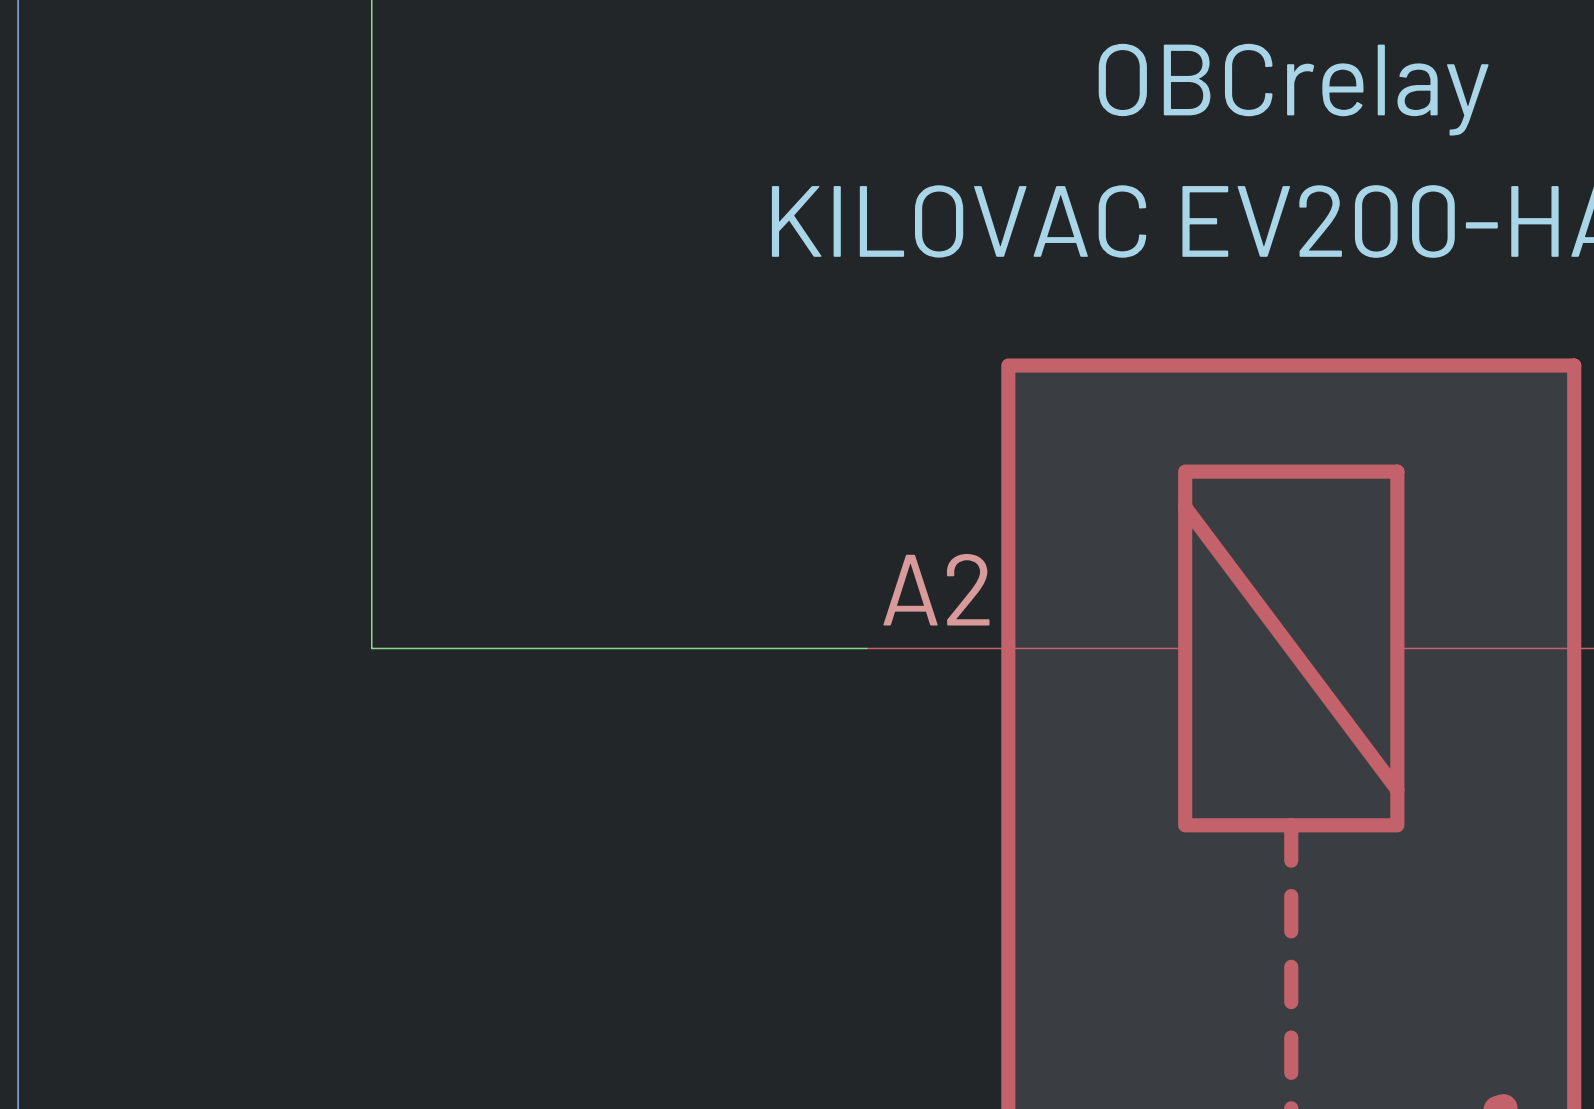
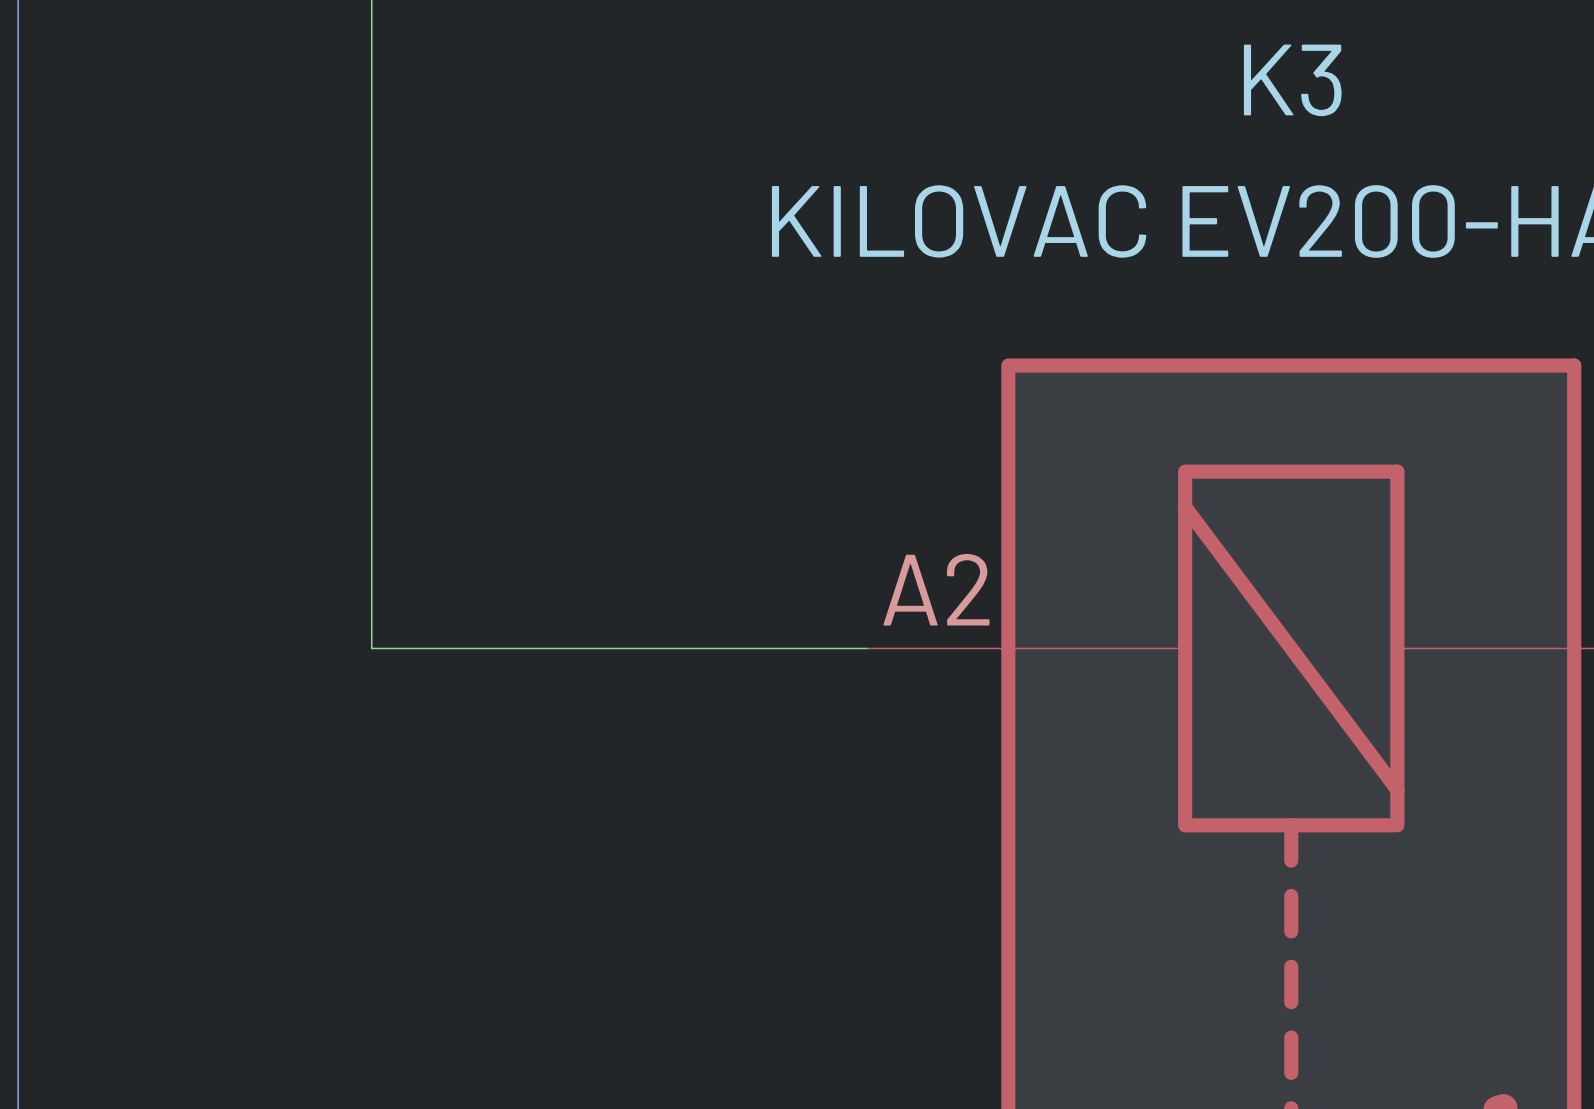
OBCrelay name: OBCrelay (1293, 89) -> K3 (1292, 80)

